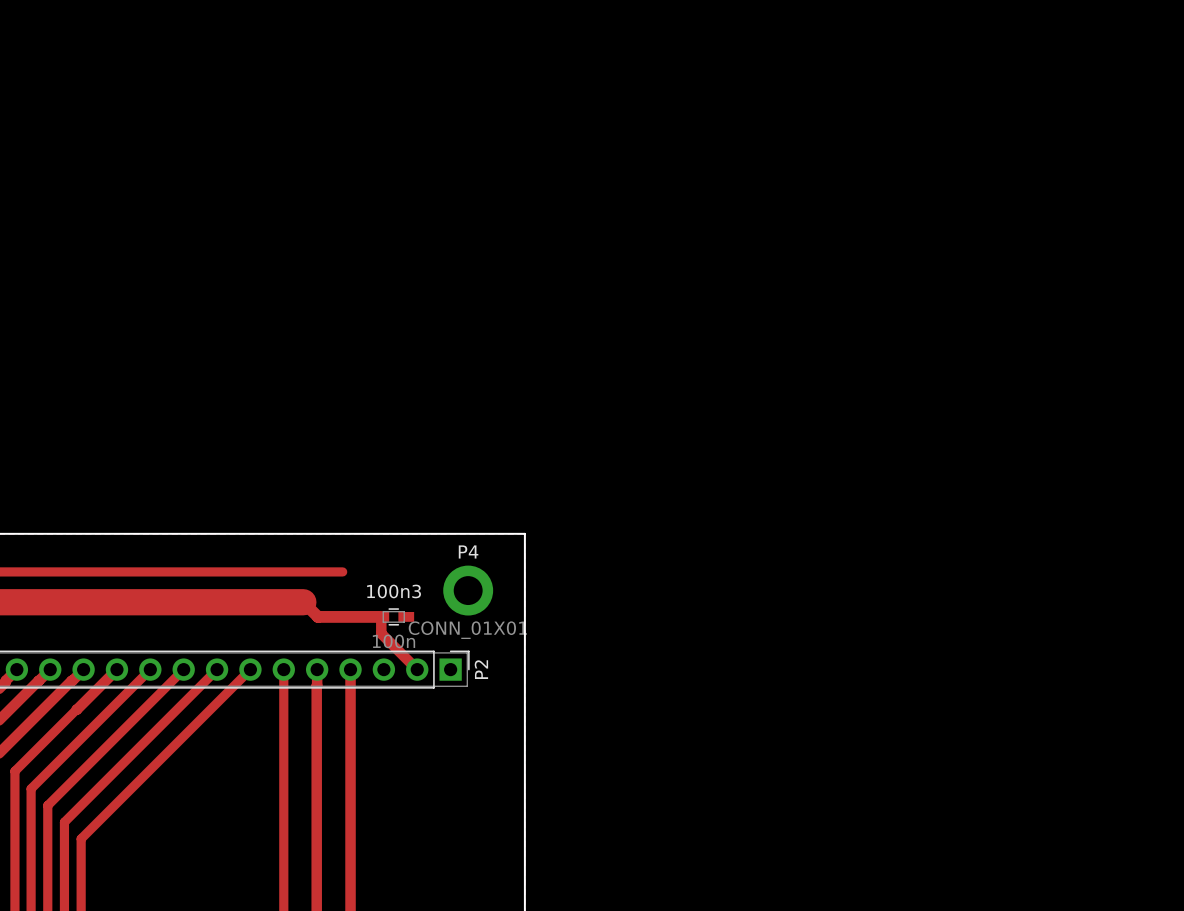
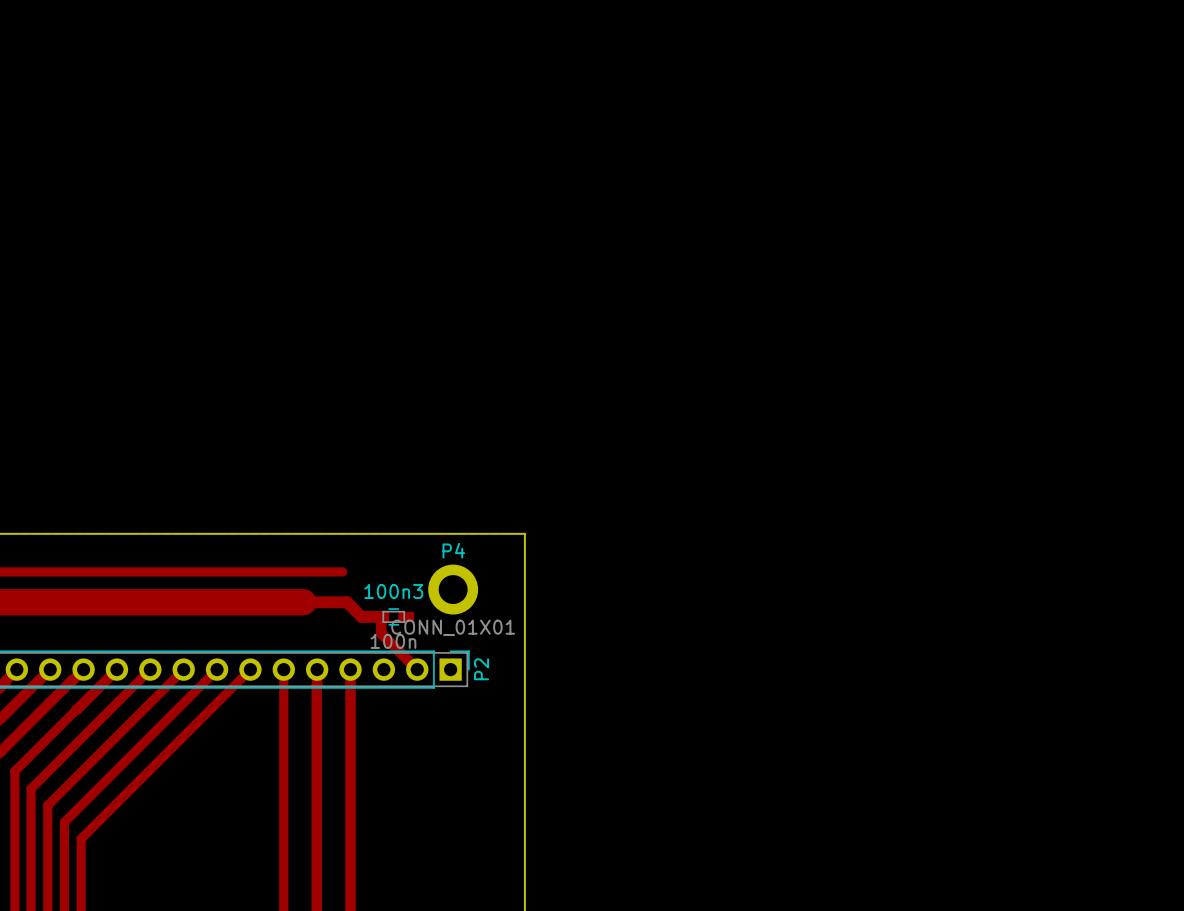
P4 position: (468, 590) -> (453, 589)
top track: (303, 602) (318, 616) (361, 616) -> (303, 602) (346, 602) (361, 616)

